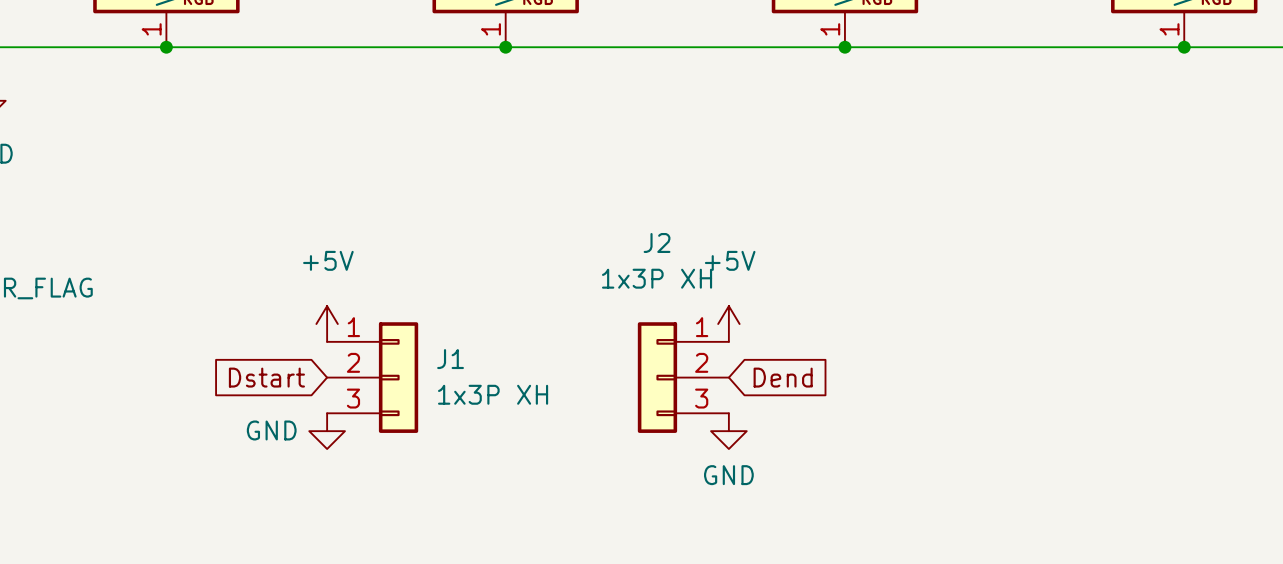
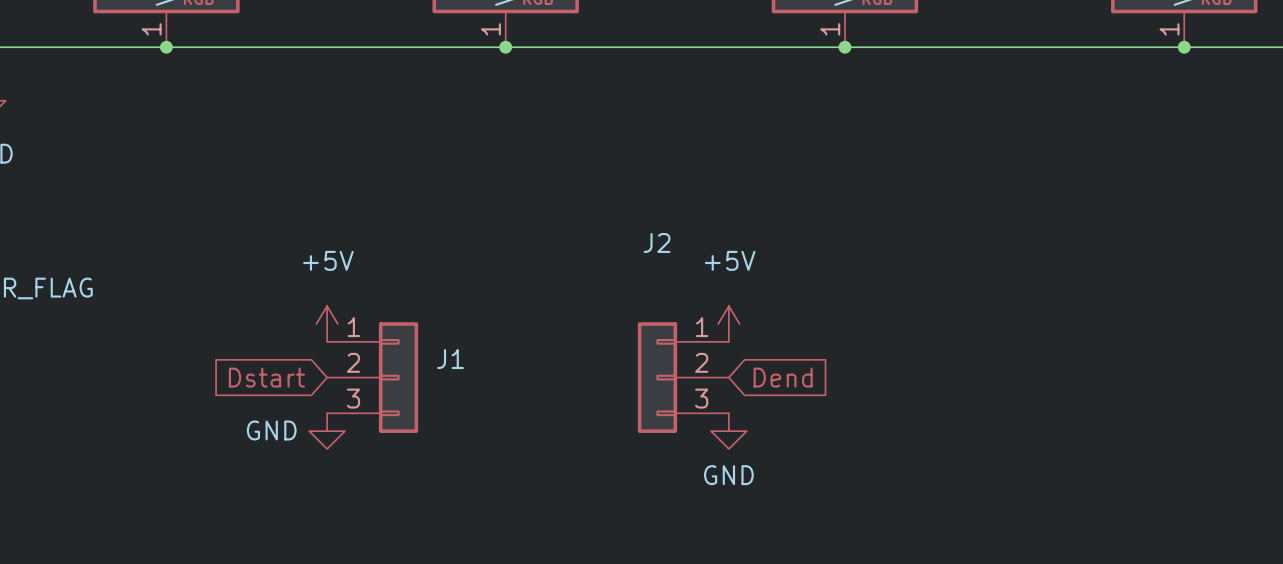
J2 value: 1x3P XH (657, 278) -> none
J1 value: 1x3P XH (493, 394) -> none

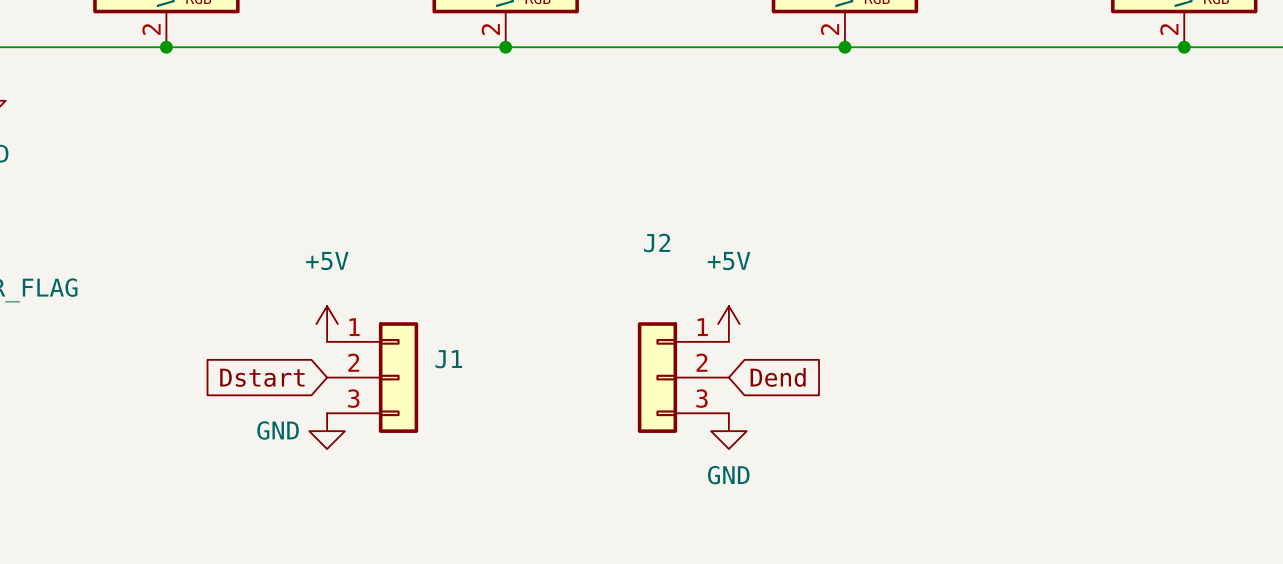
part pin number: 1 (151, 29) -> 2 (151, 29)
part pin number: 1 (490, 29) -> 2 (490, 29)
part pin number: 1 (830, 29) -> 2 (830, 29)
part pin number: 1 (1169, 29) -> 2 (1169, 29)

